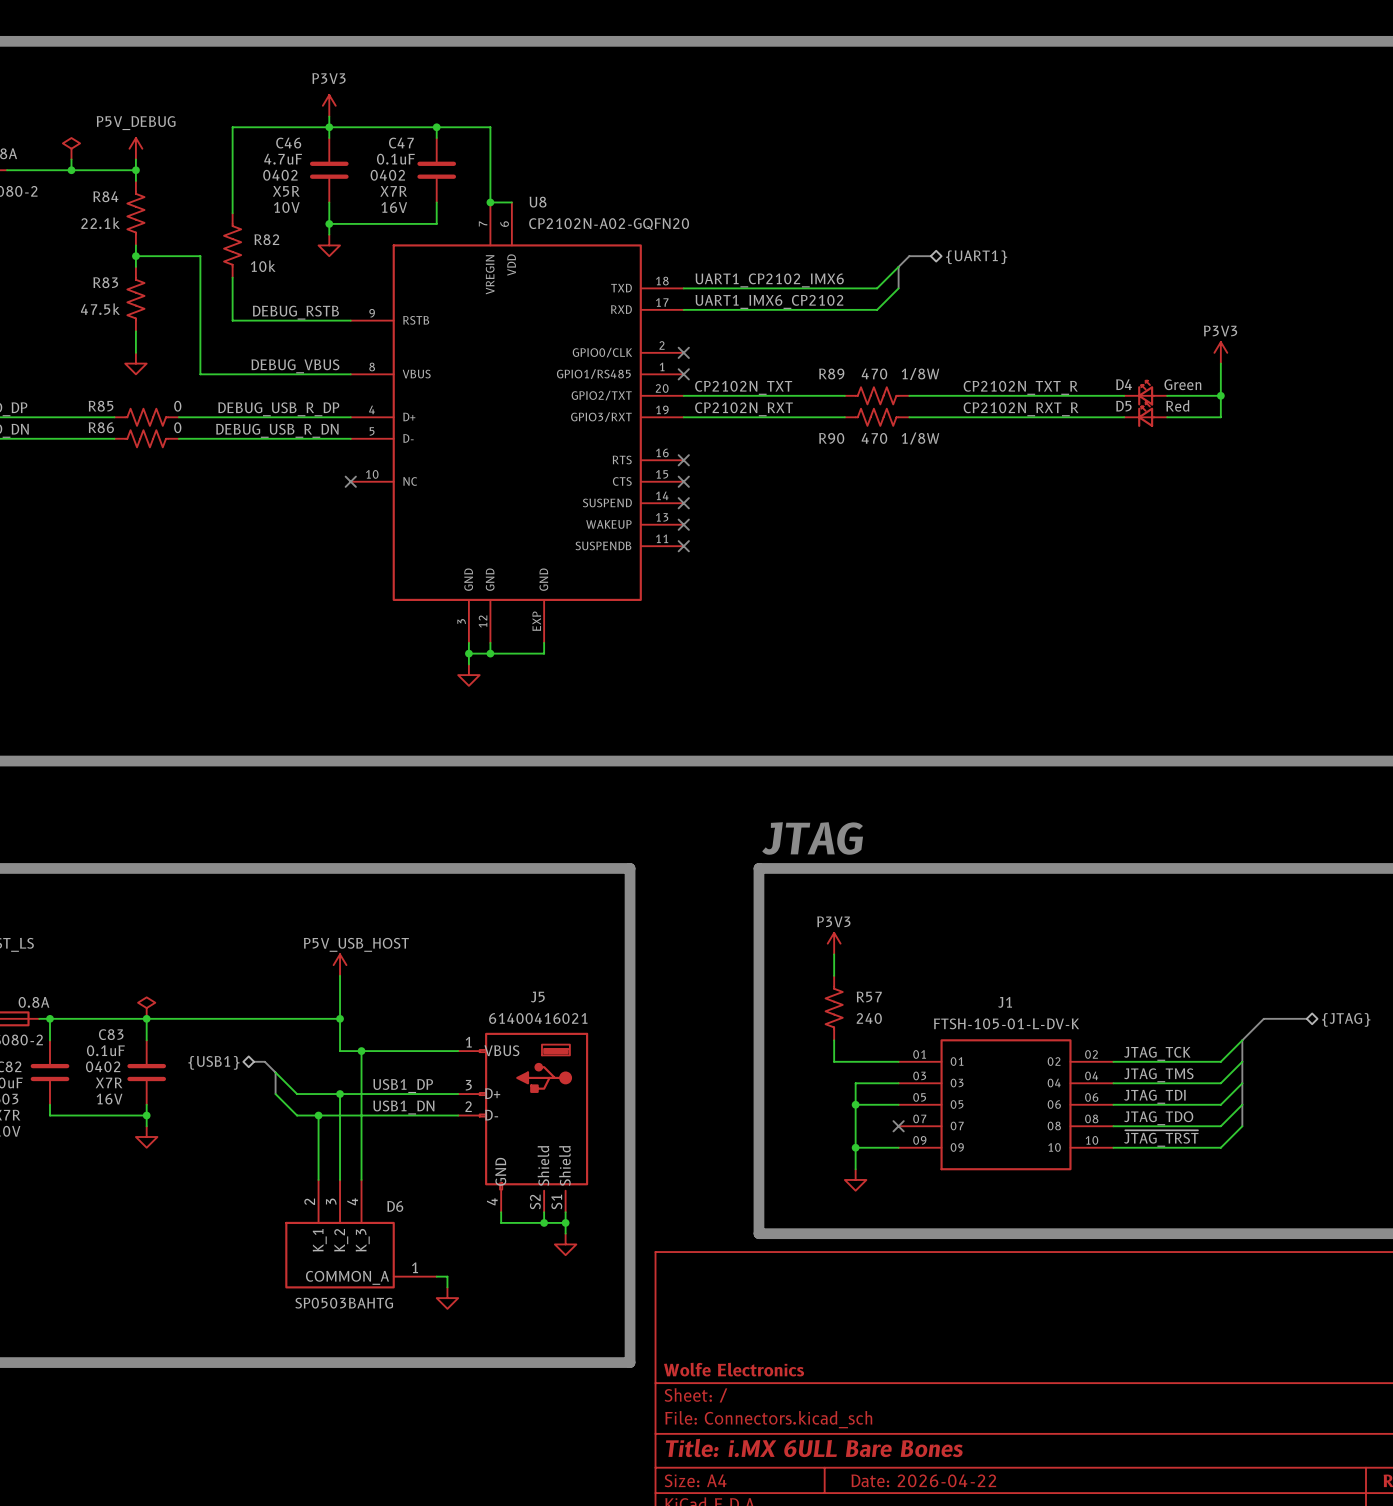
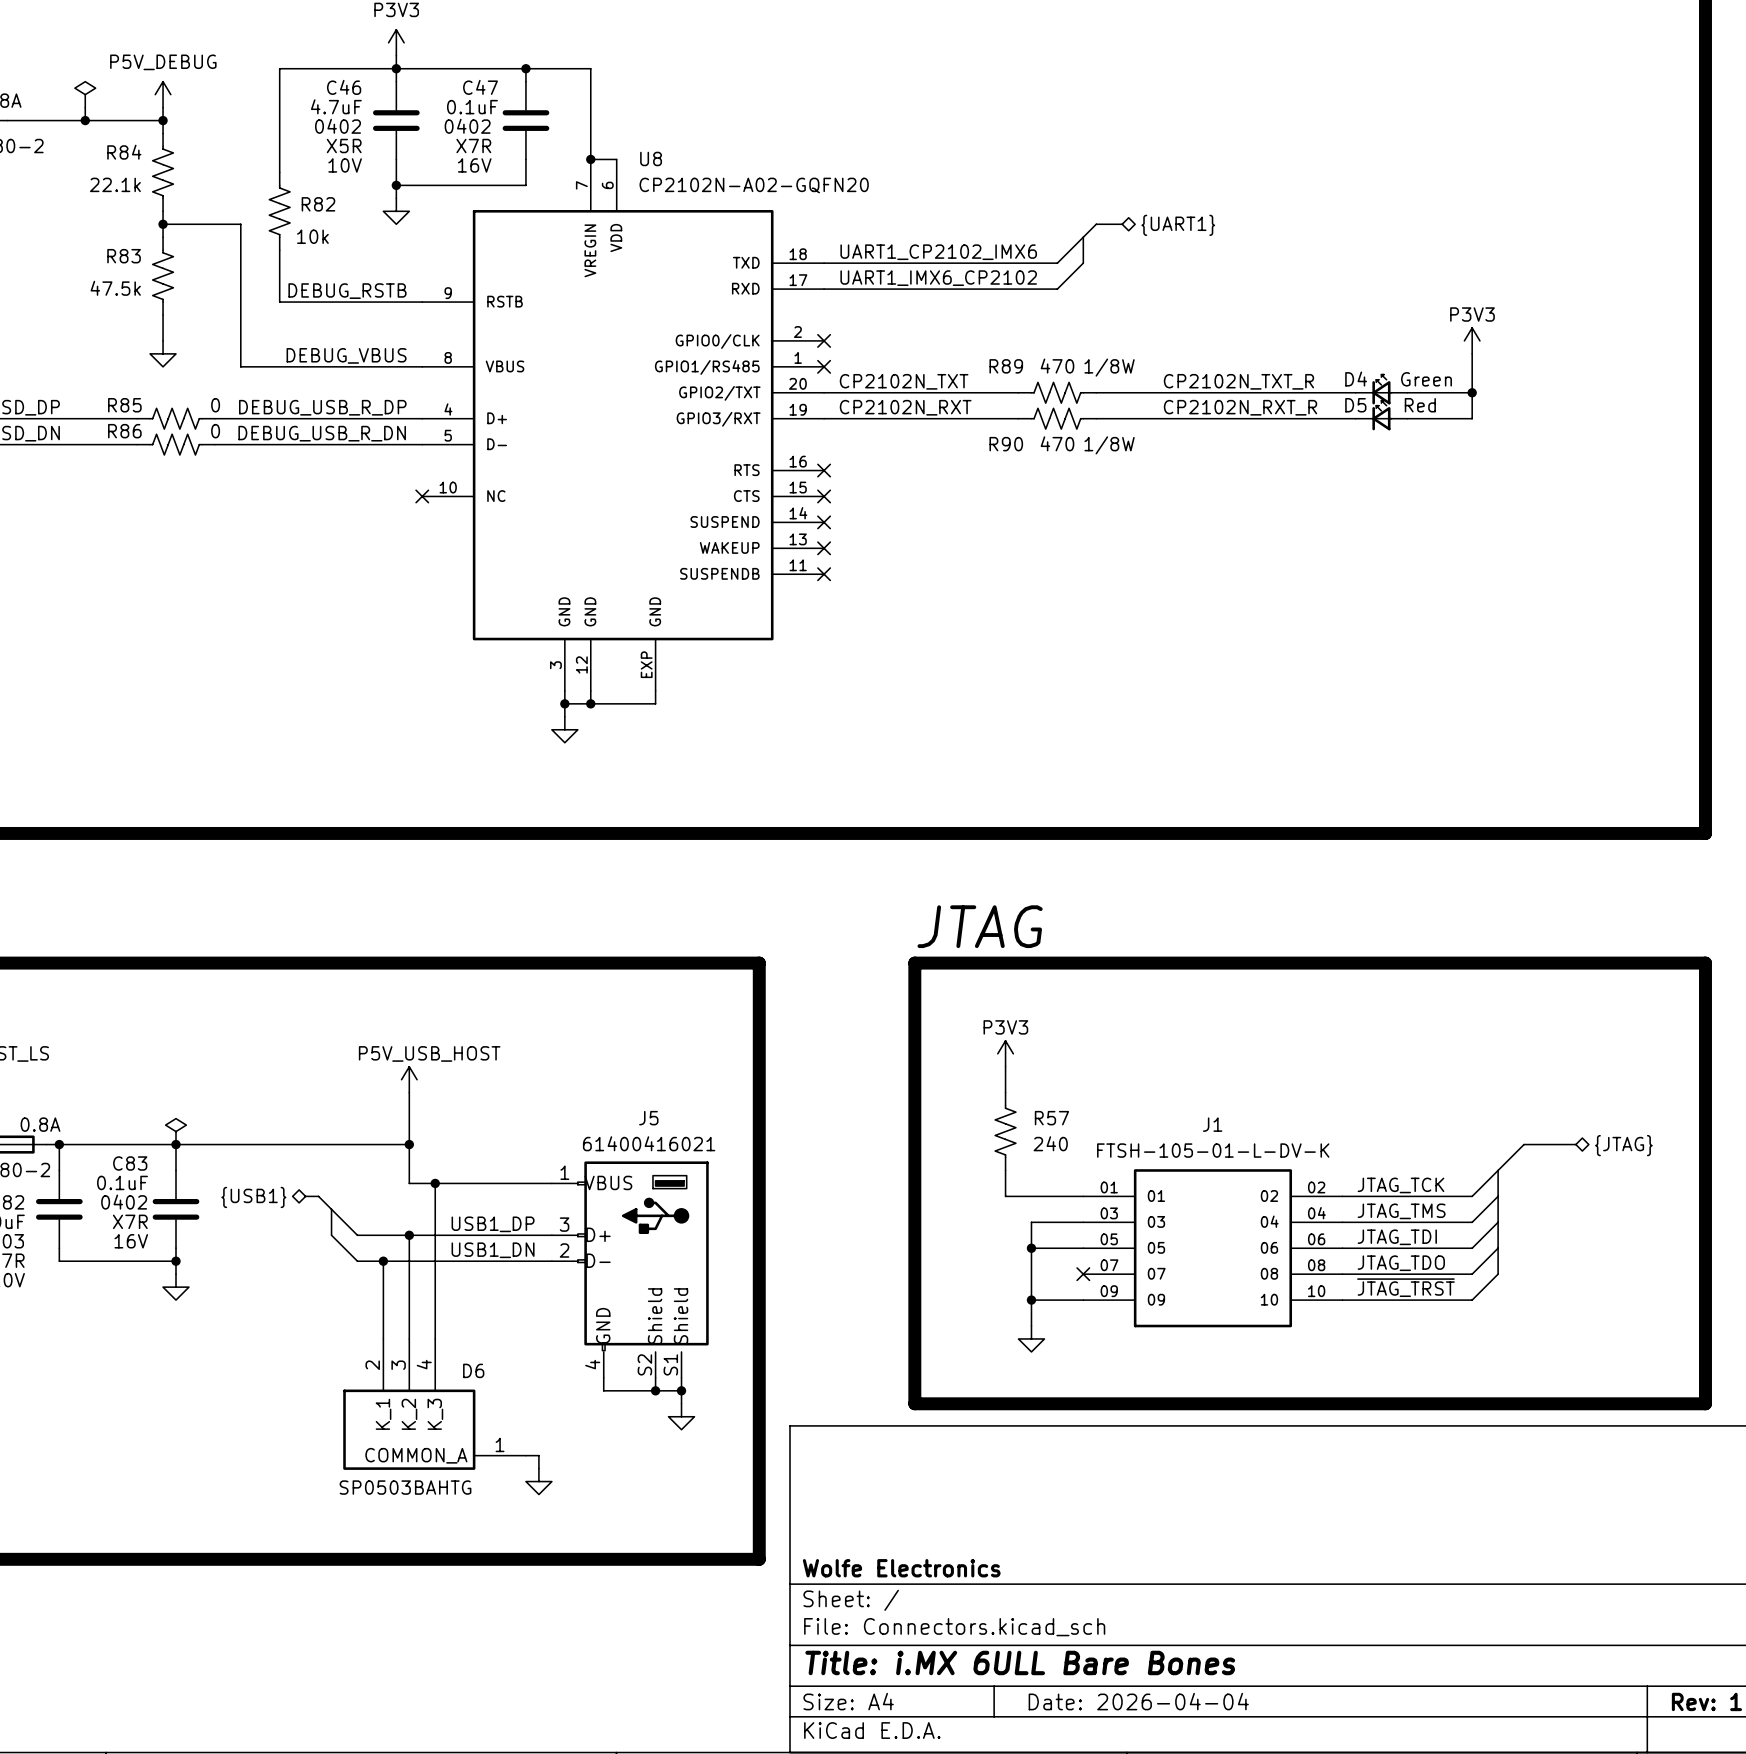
title block: Date: 2026-04-22 (923, 1480) -> Date: 2026-04-04 (1138, 1701)

